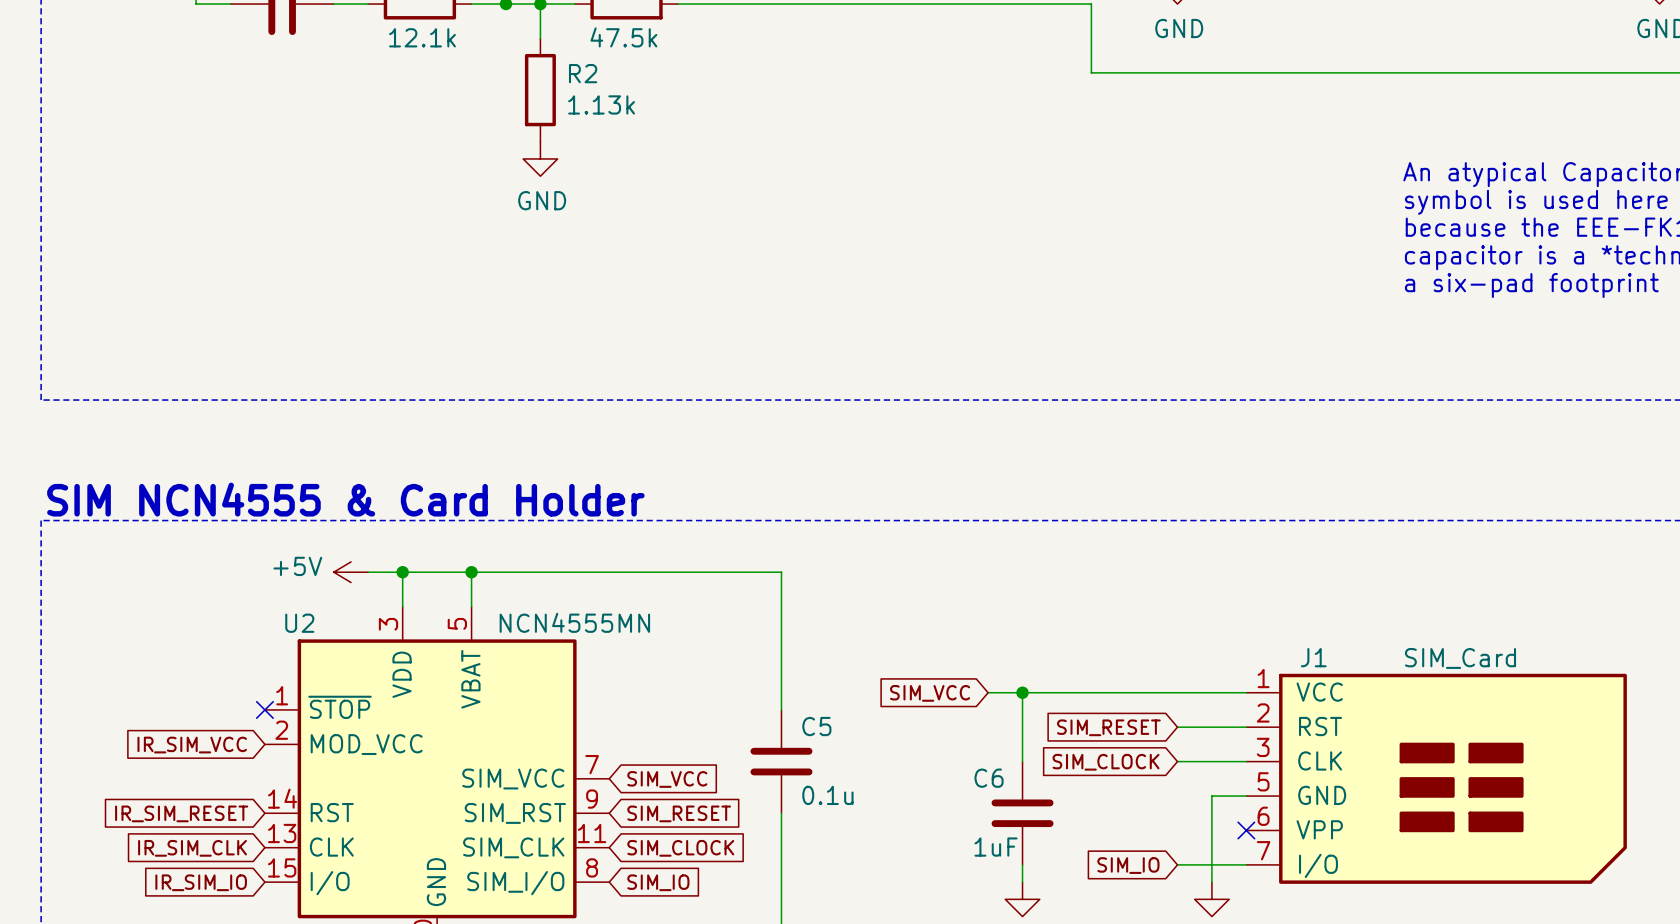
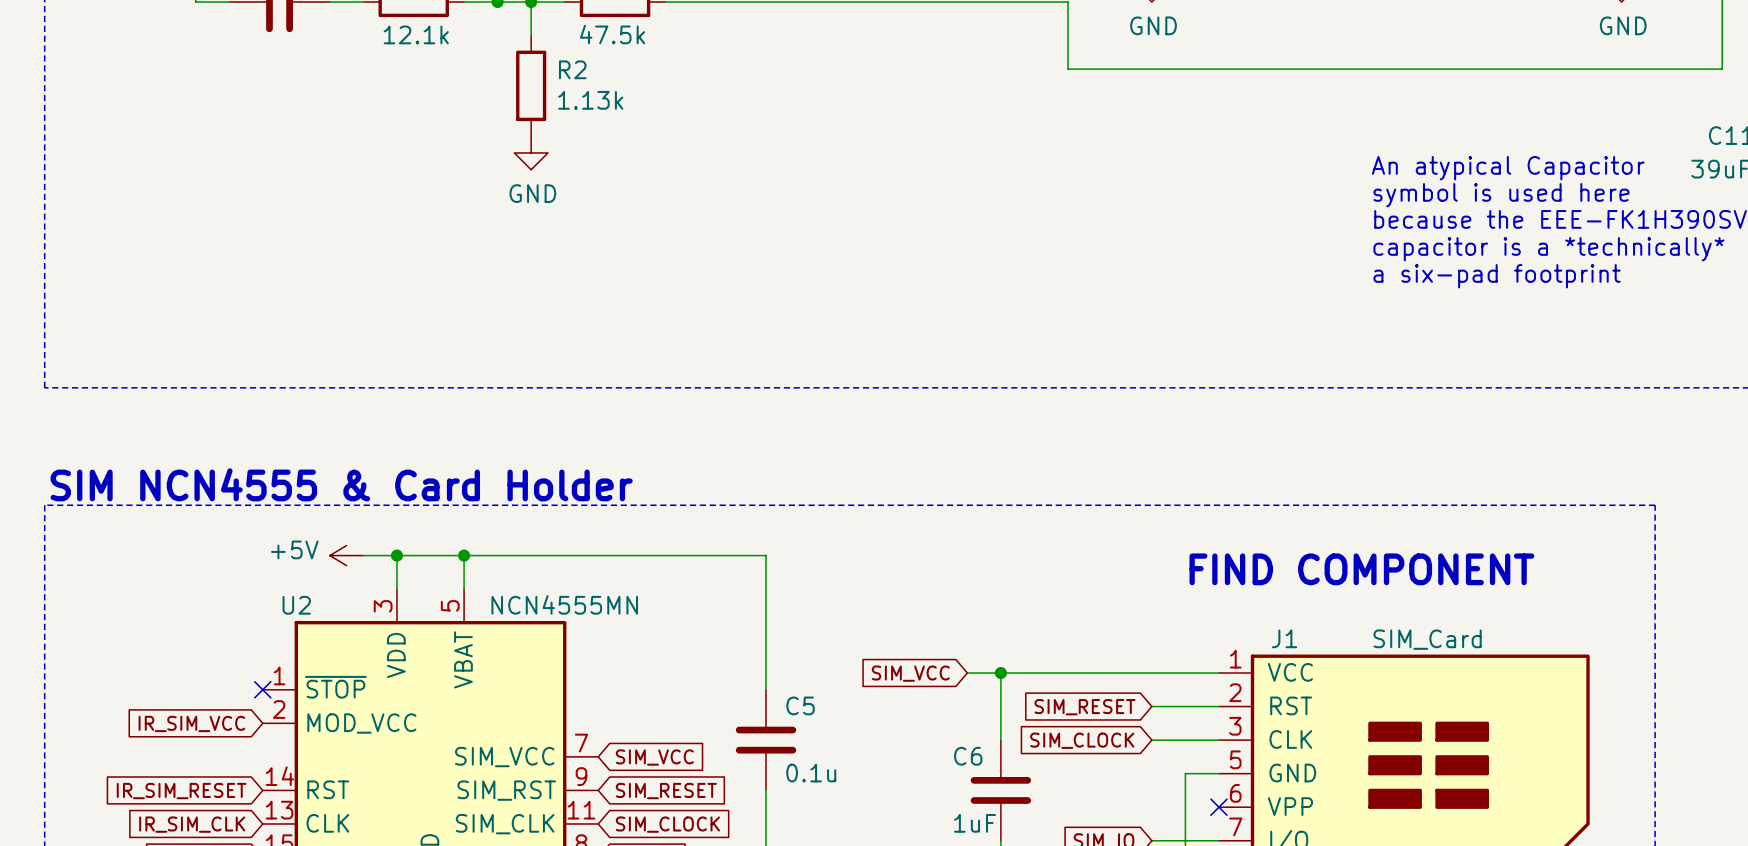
text: none -> FIND COMPONENT (1361, 569)

